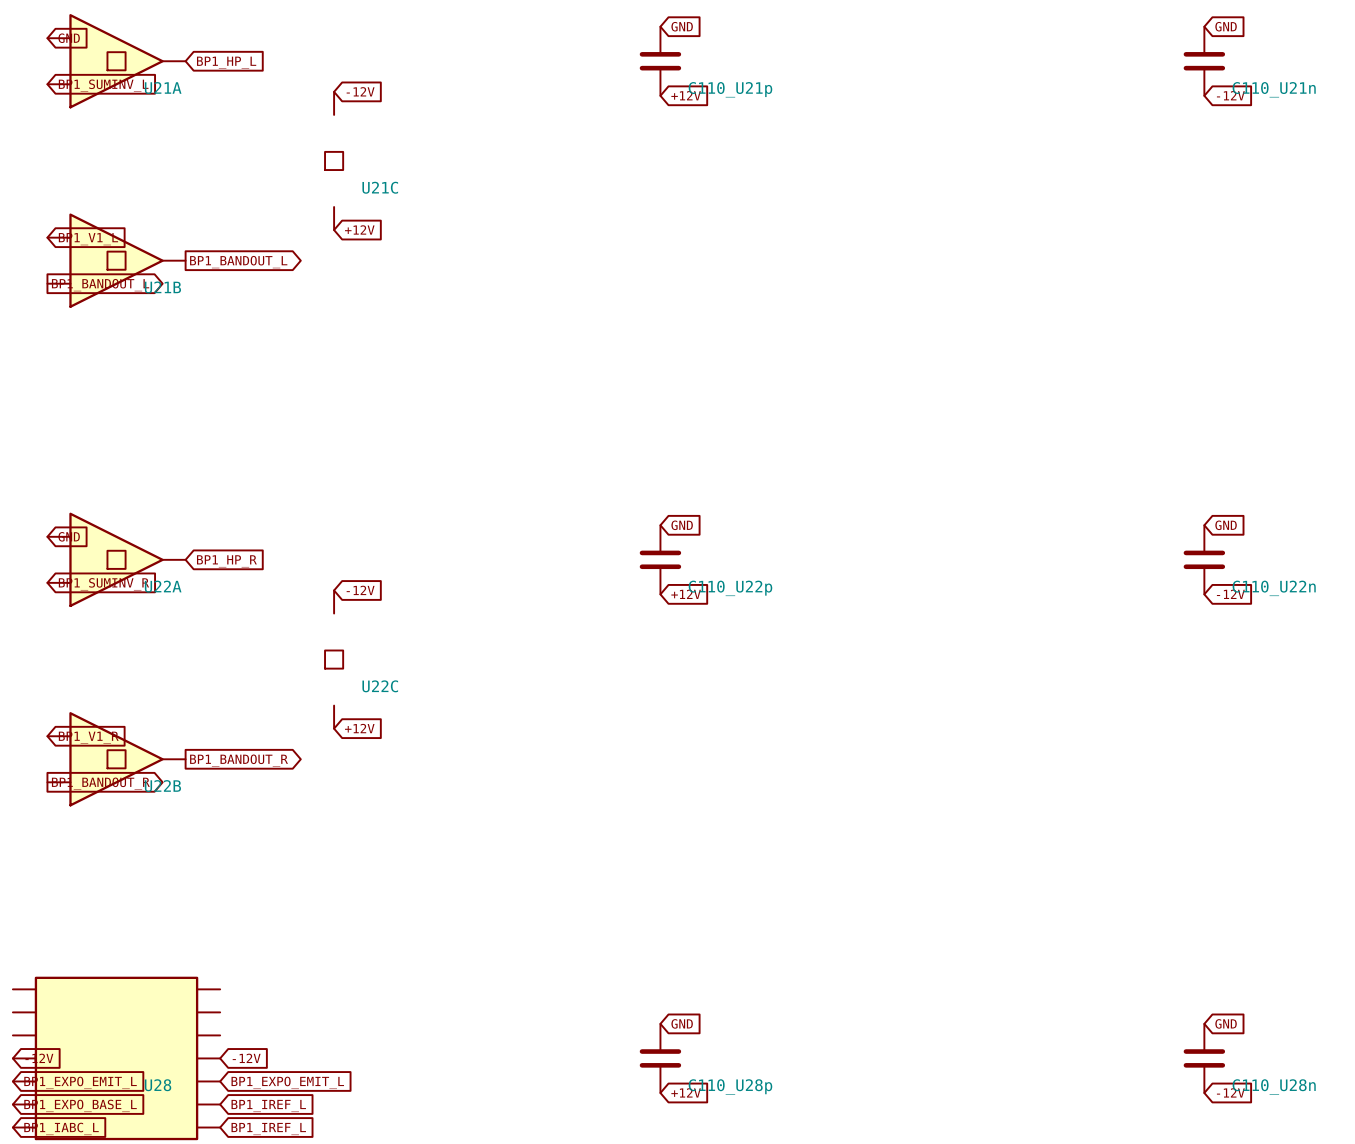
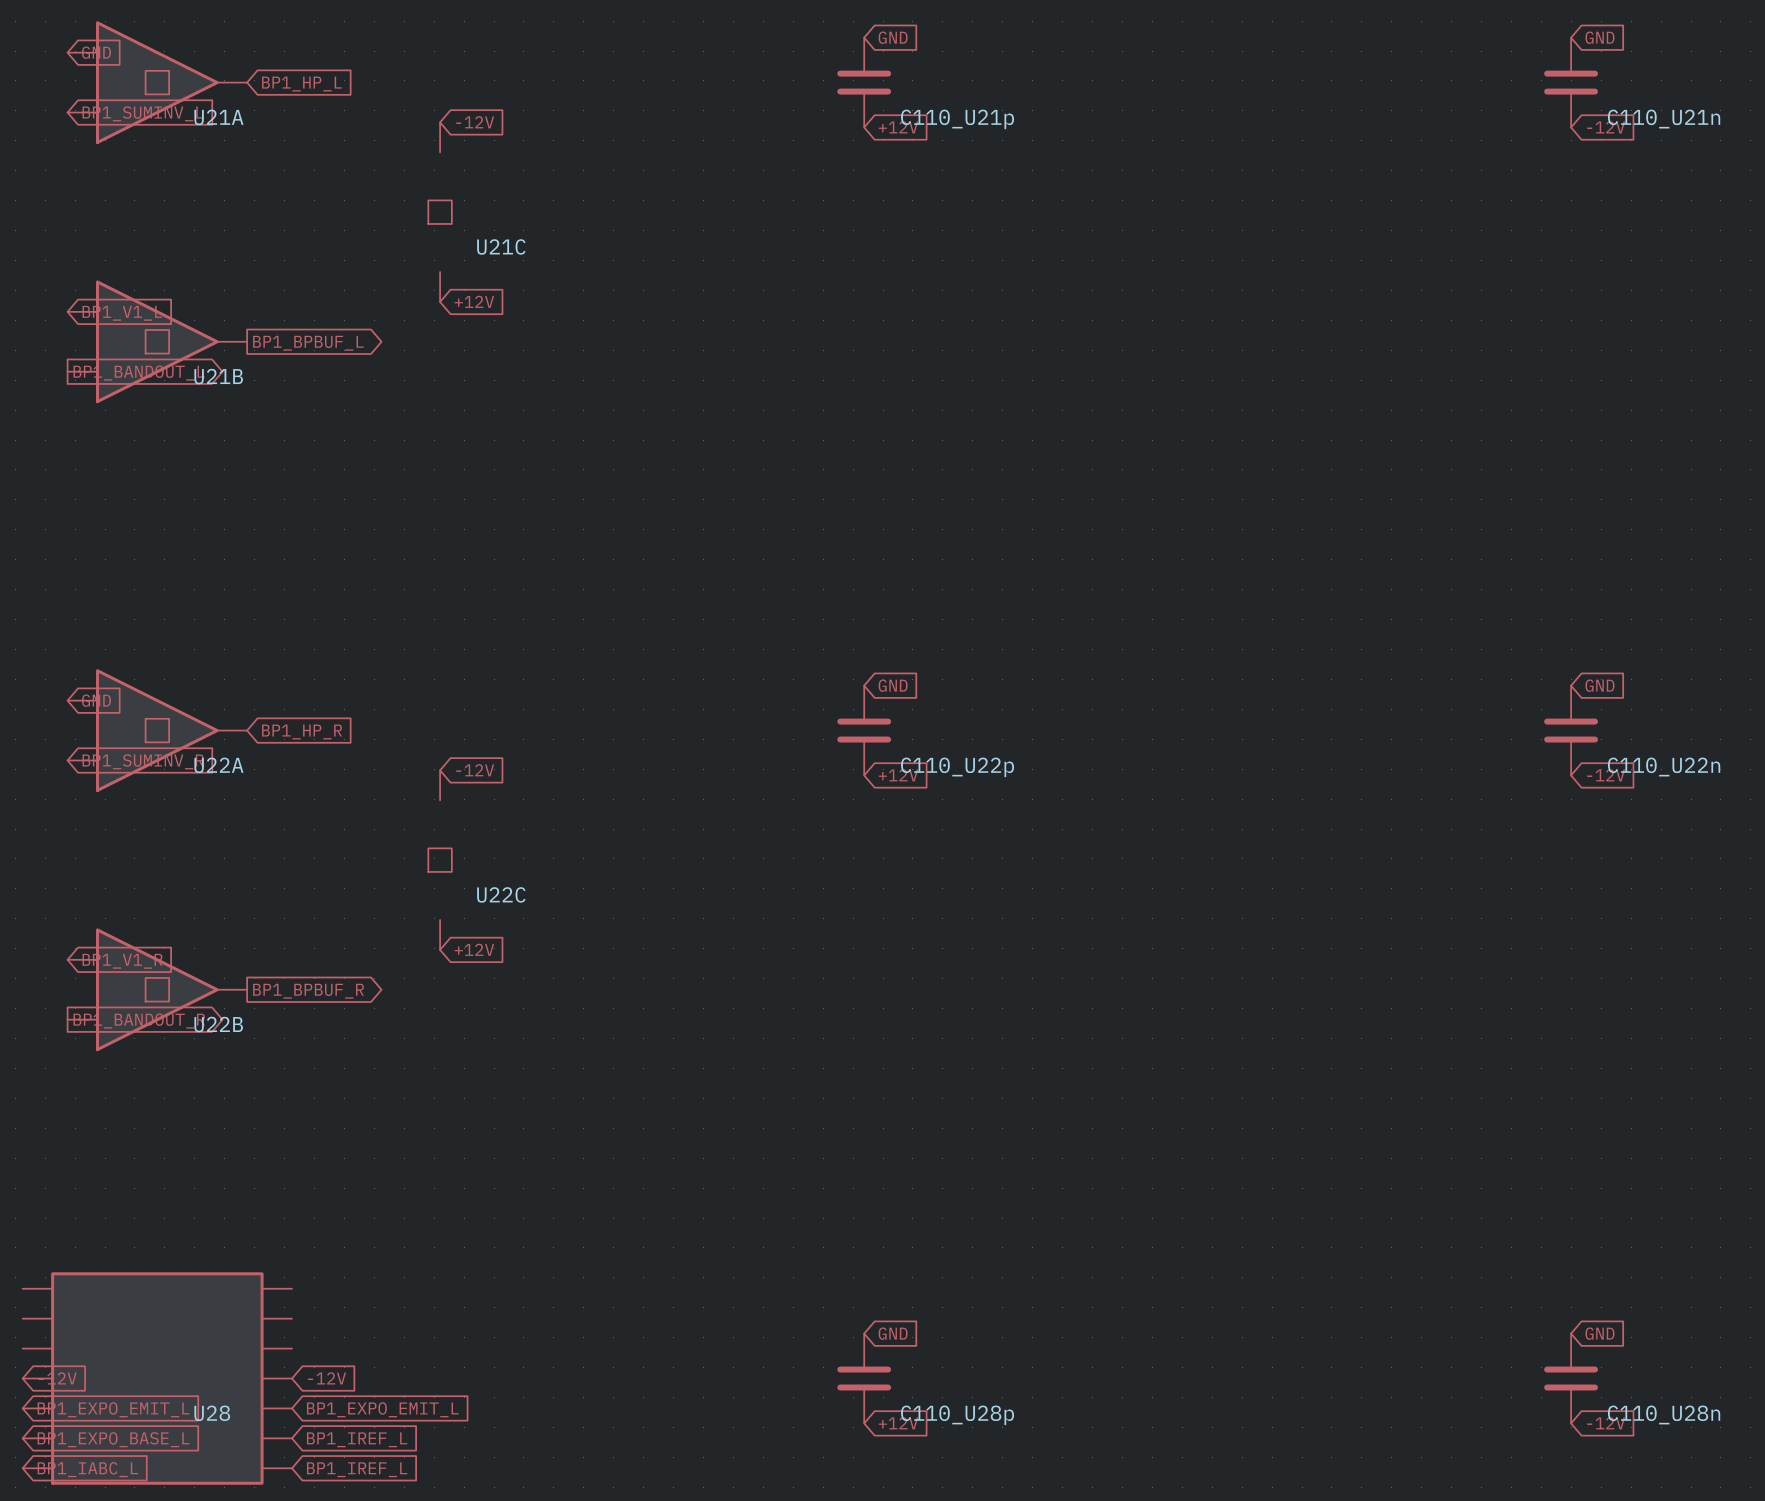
global label: BP1_BANDOUT_L (238, 262) -> BP1_BPBUF_L (308, 343)
global label: BP1_BANDOUT_R (239, 760) -> BP1_BPBUF_R (308, 991)

